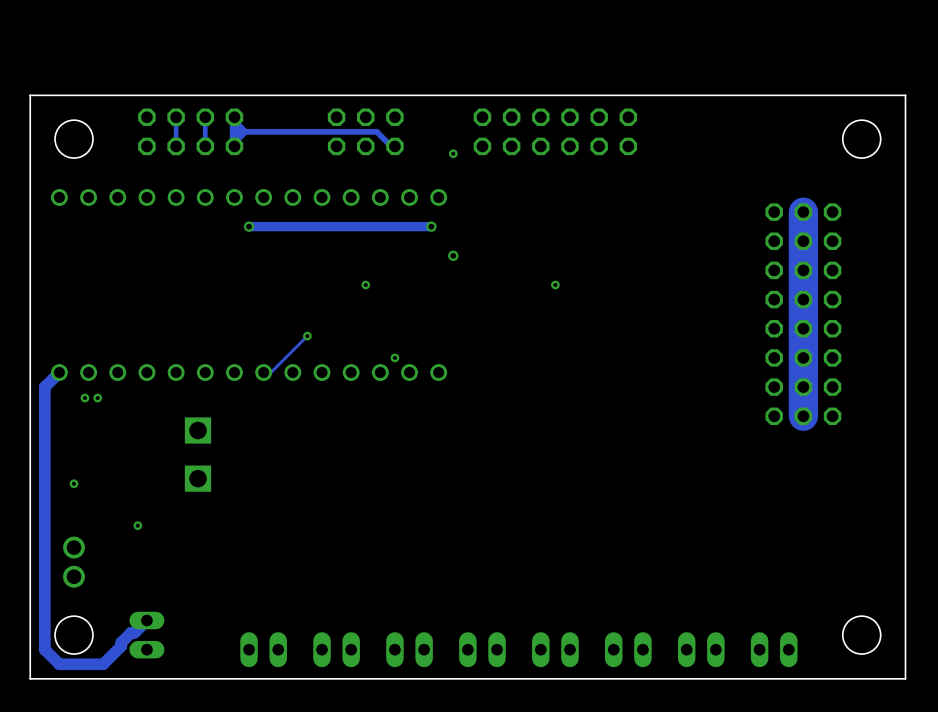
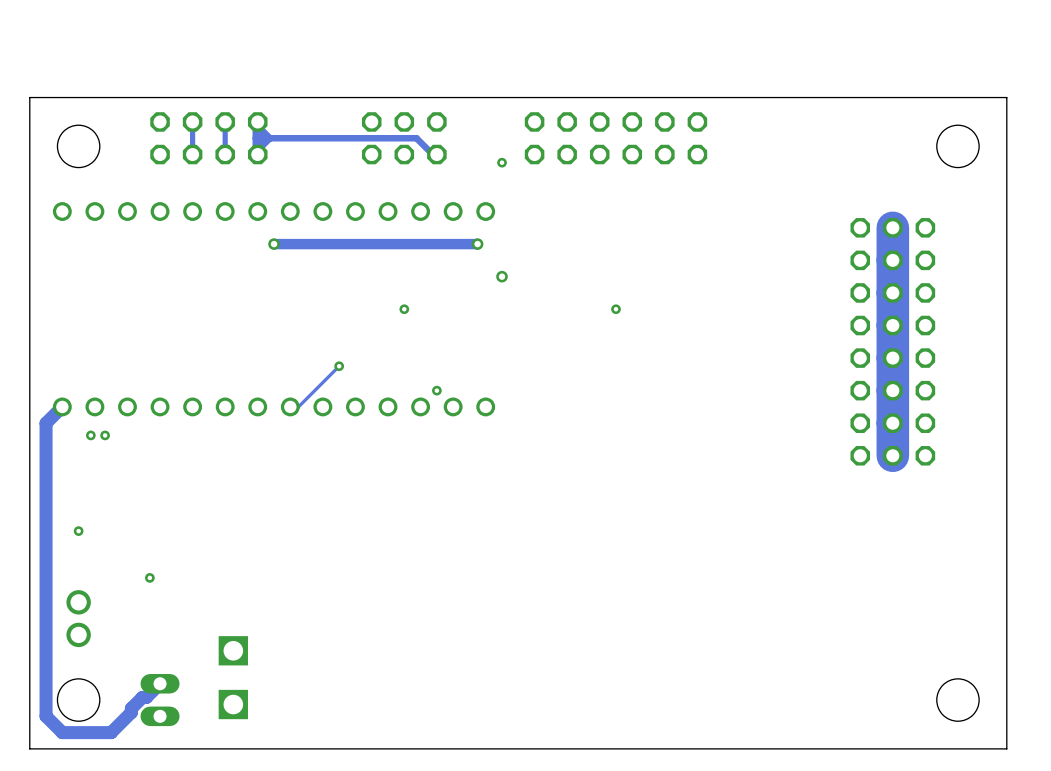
part position: (198, 454) -> (233, 677)
part: (263, 649) -> none
part: (336, 649) -> none
part: (409, 649) -> none
part: (482, 649) -> none
part: (555, 649) -> none
part: (628, 649) -> none
part: (701, 649) -> none
part: (774, 649) -> none

